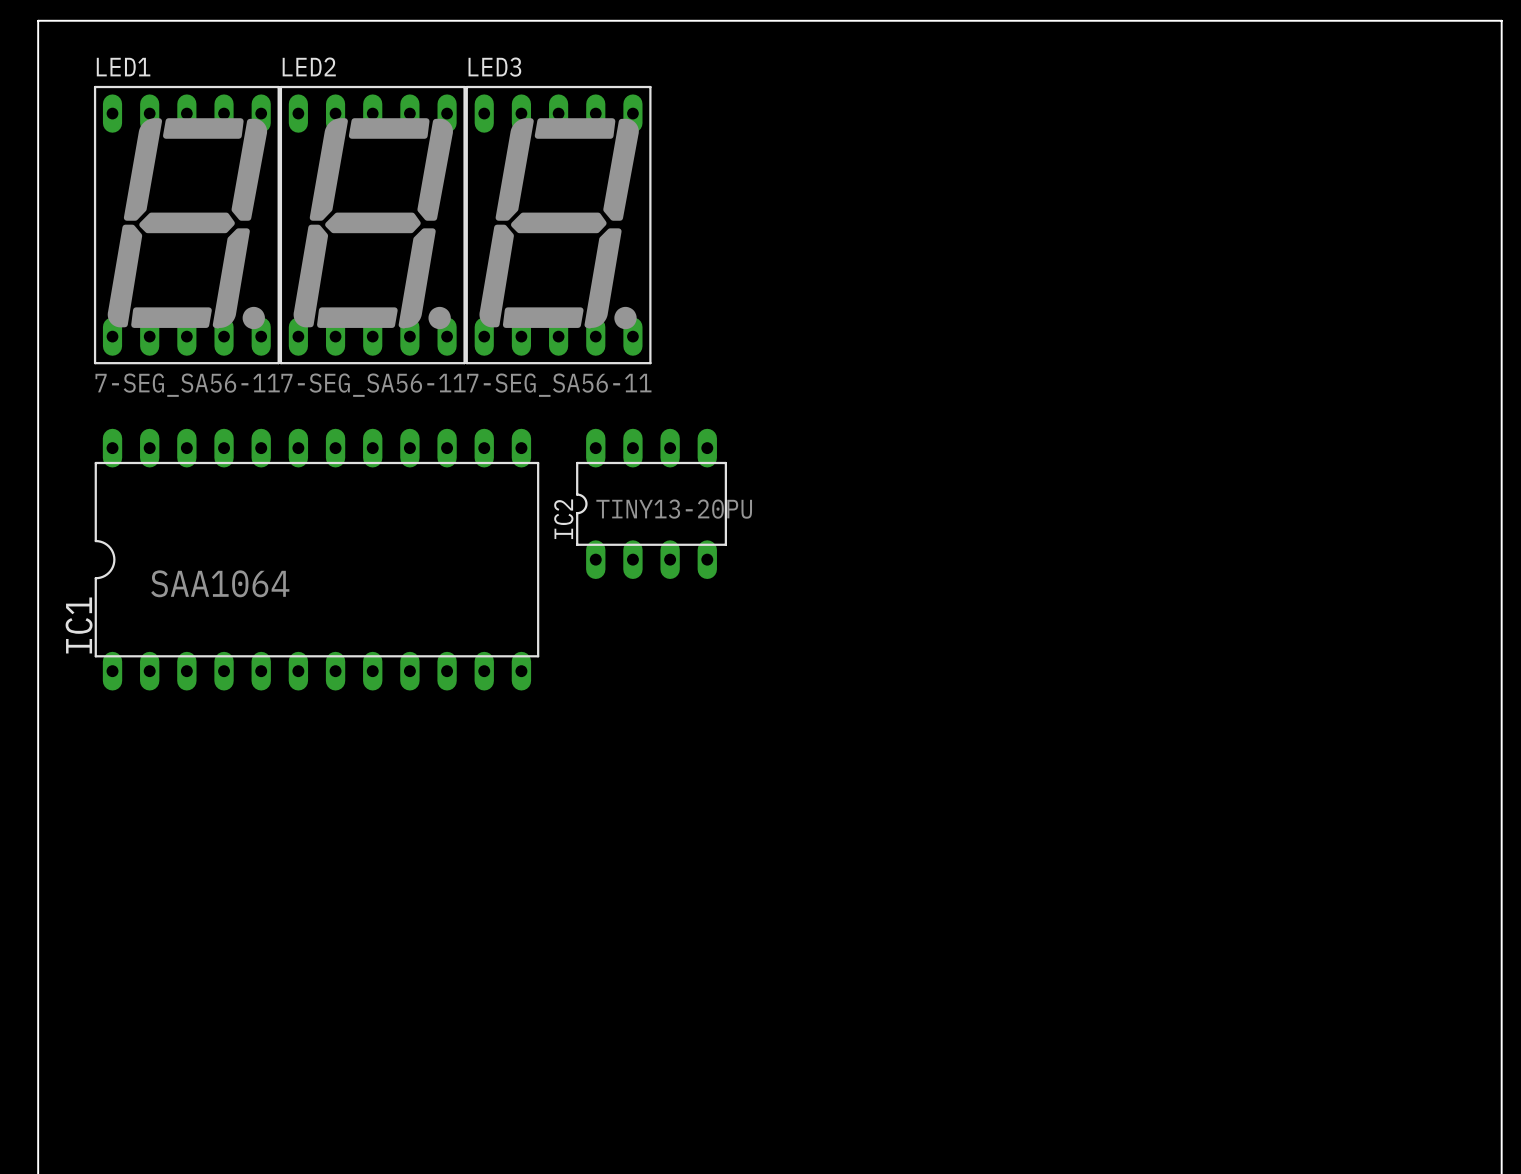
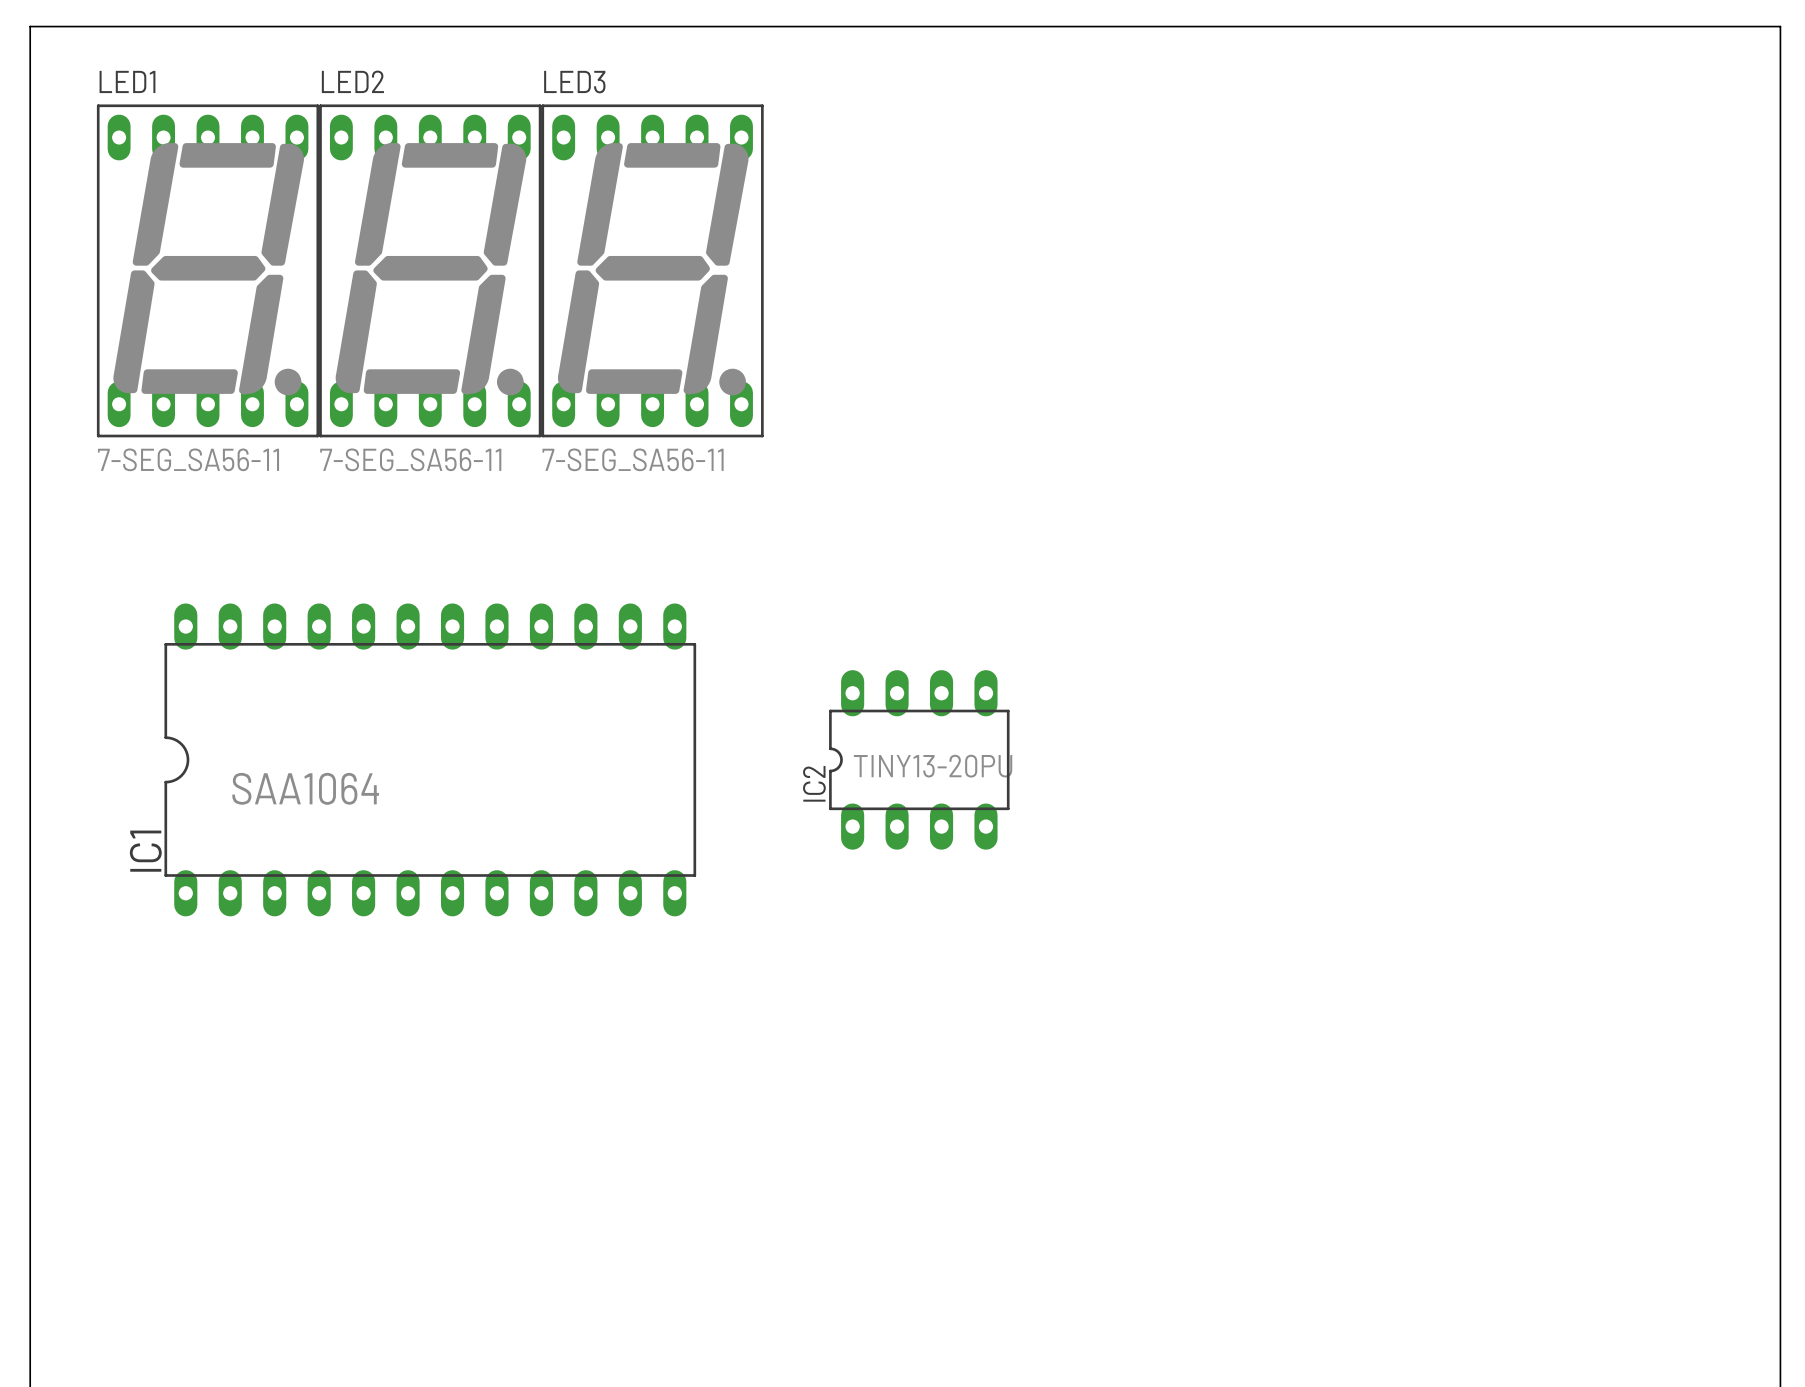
IC2 position: (651, 503) -> (919, 759)
IC1 position: (316, 559) -> (430, 759)

